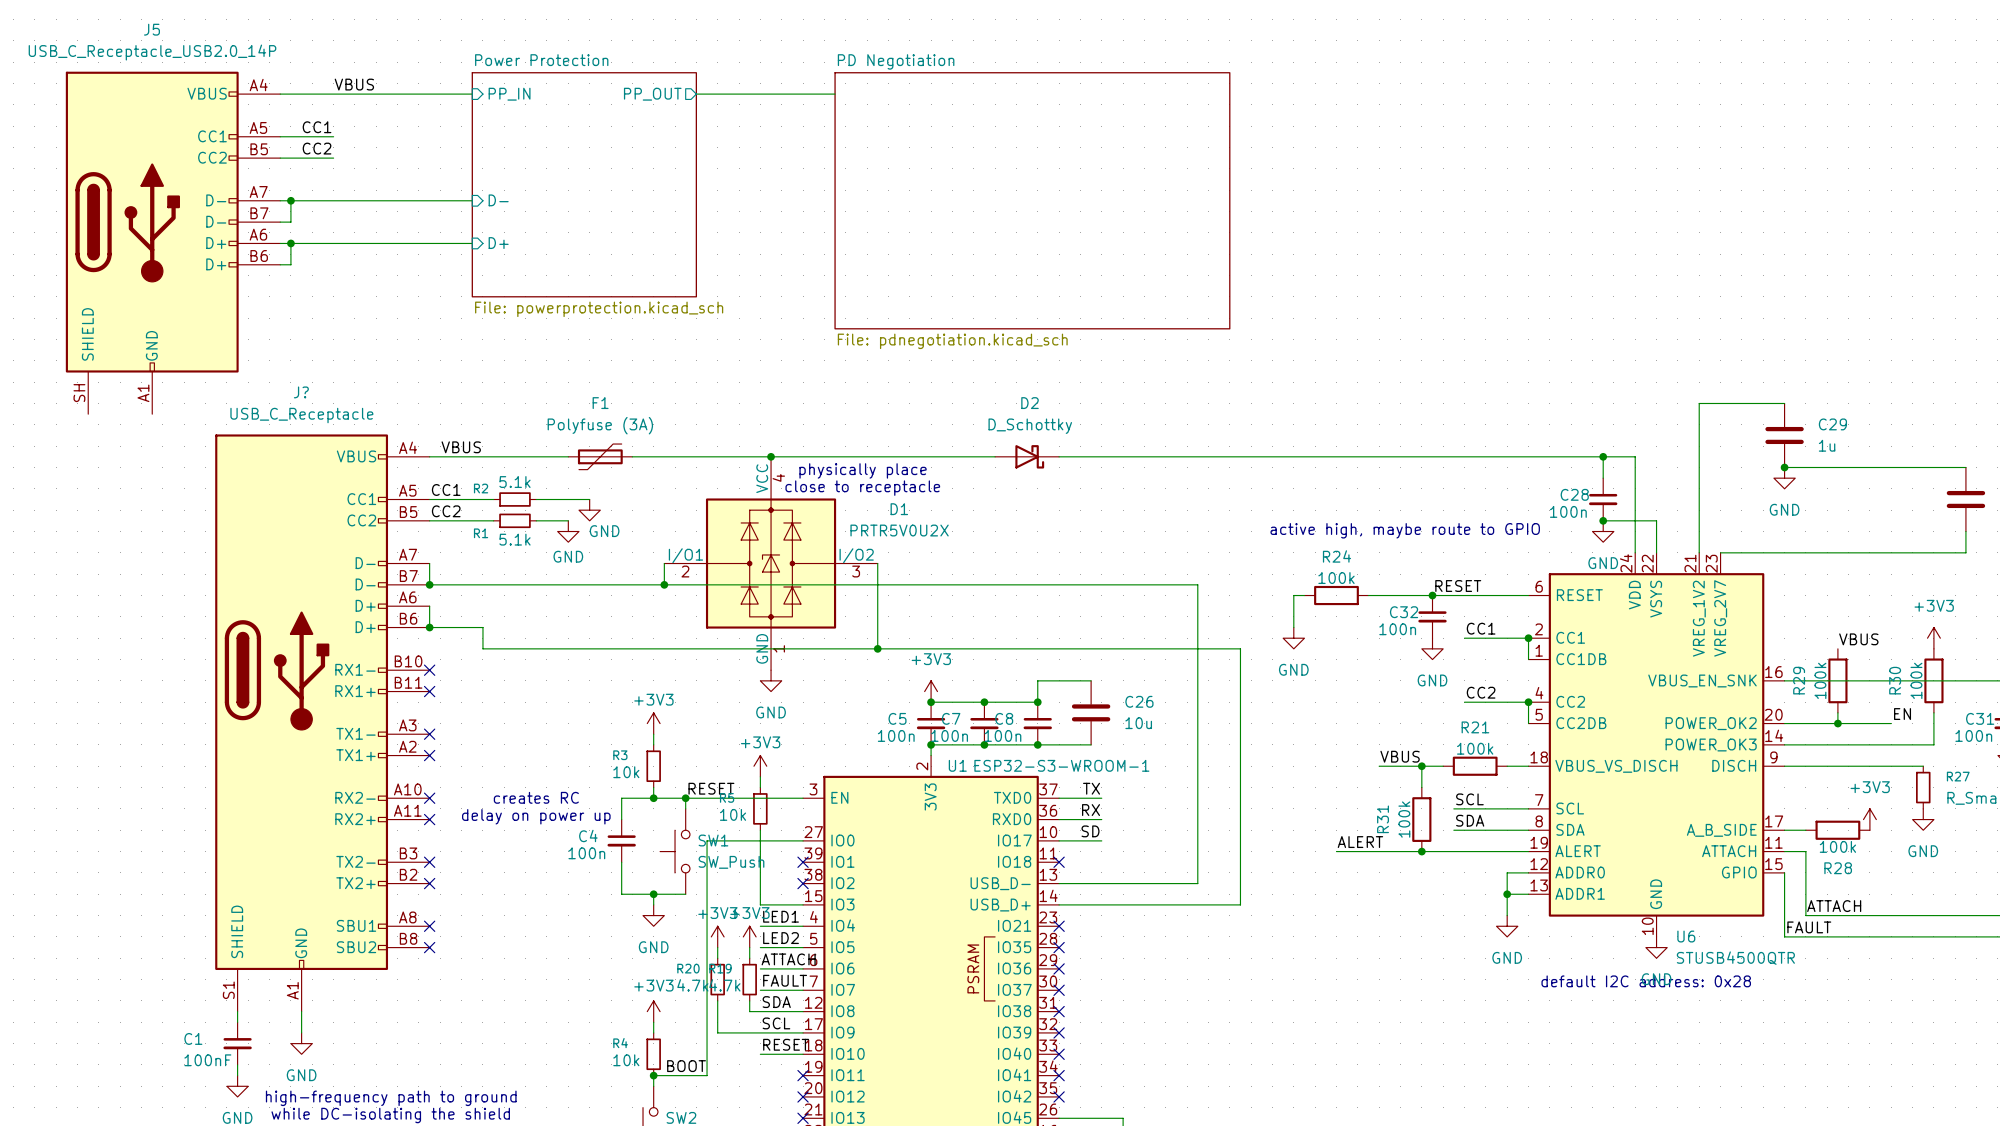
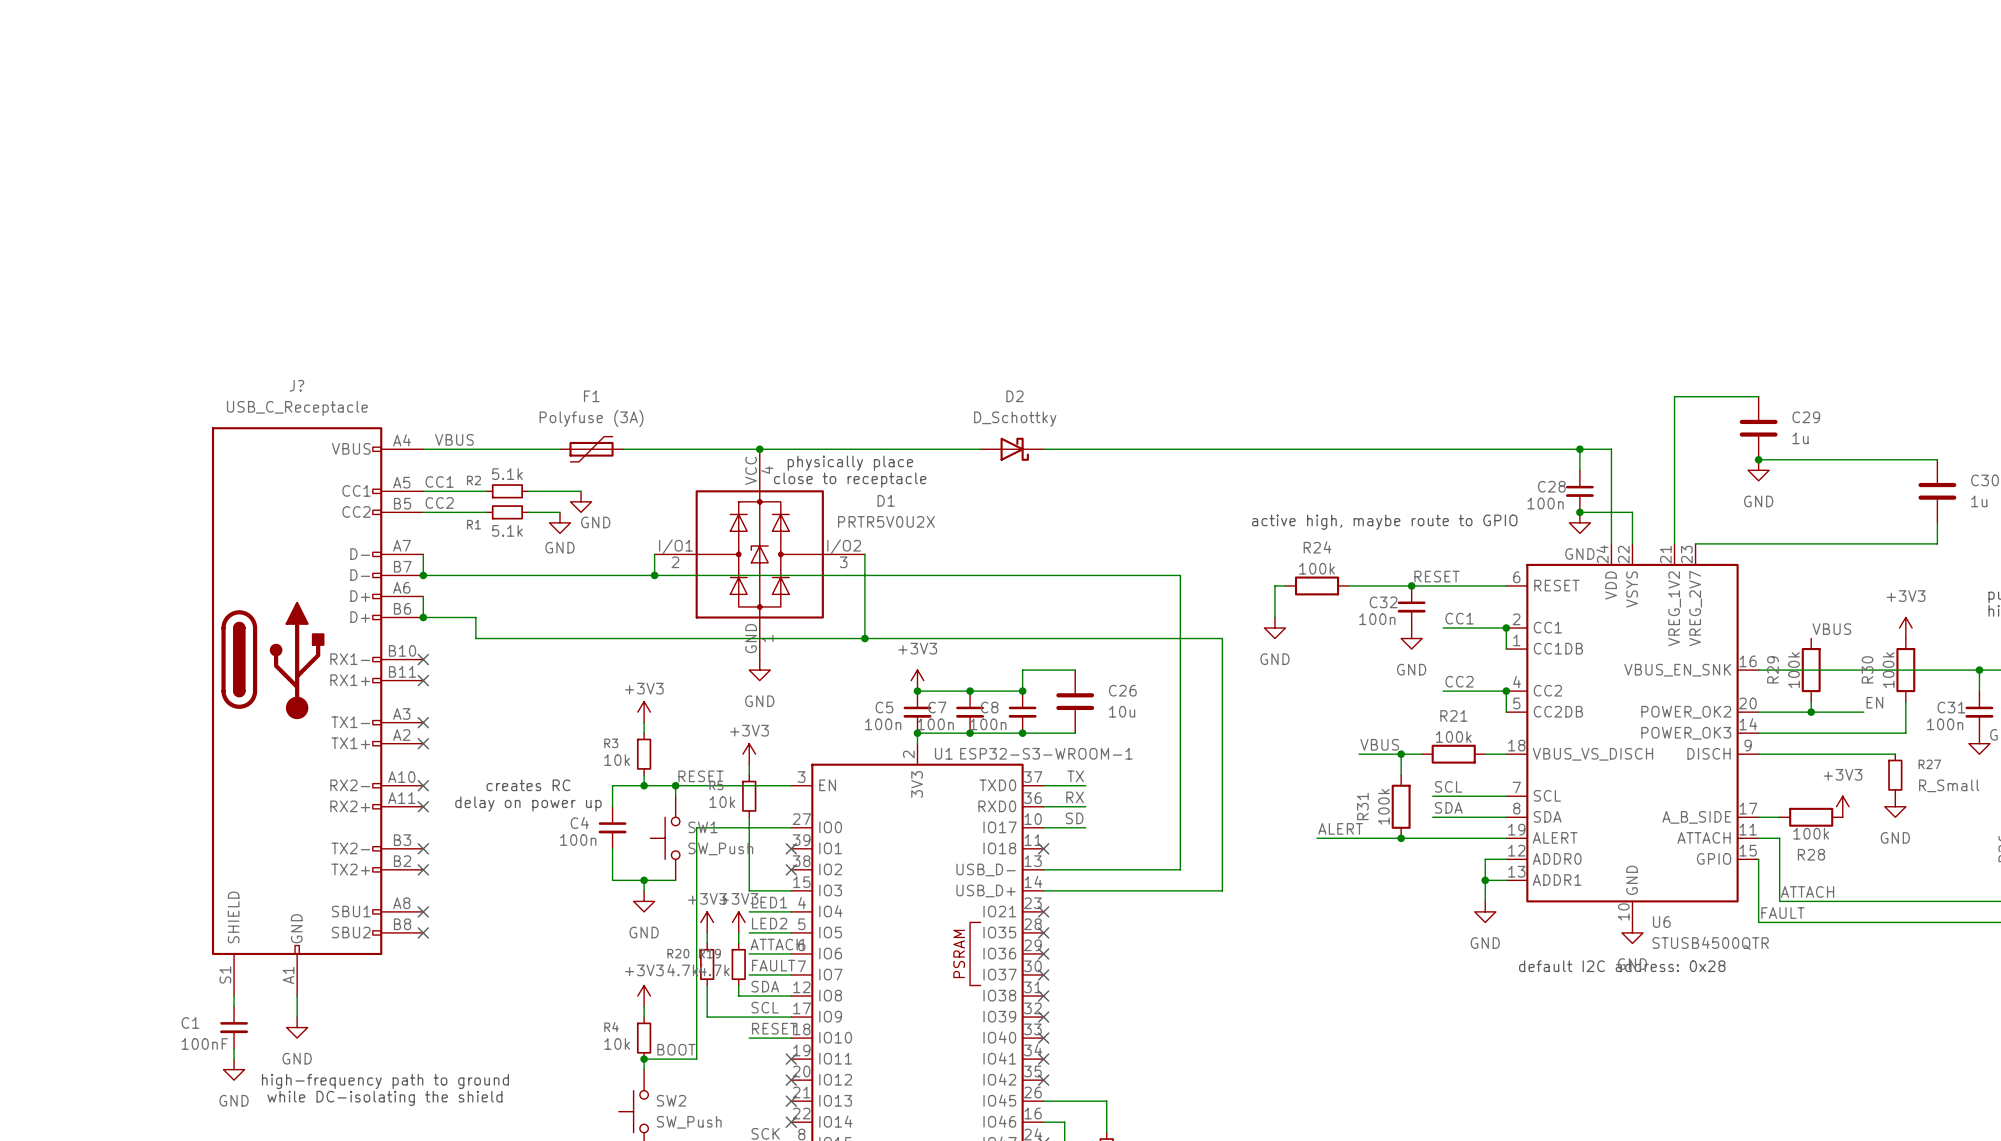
label: VBUS (354, 84) -> none
wire: (280, 94) (472, 94) -> none
sheet pin: PP_IN (509, 94) -> none
sheet pin: PP_OUT (652, 94) -> none
wire: (696, 94) (835, 94) -> none
label: CC1 (317, 127) -> none
wire: (280, 136) (333, 136) -> none
label: CC2 (317, 148) -> none
wire: (280, 158) (333, 158) -> none
sheet Power Protection: File: powerprotection.kicad_sch (584, 184) -> none
wire: (280, 200) (472, 200) -> none
wire: (290, 200) (290, 222) (280, 222) -> none
junction: (290, 200) -> none
sheet pin: D- (498, 200) -> none
sheet PD Negotiation: File: pdnegotiation.kicad_sch (1032, 200) -> none
J5: USB_C_Receptacle_USB2.0_14P (173, 242) -> none
wire: (280, 243) (472, 243) -> none
wire: (290, 243) (290, 264) (280, 264) -> none
junction: (290, 243) -> none
sheet pin: D+ (498, 243) -> none

